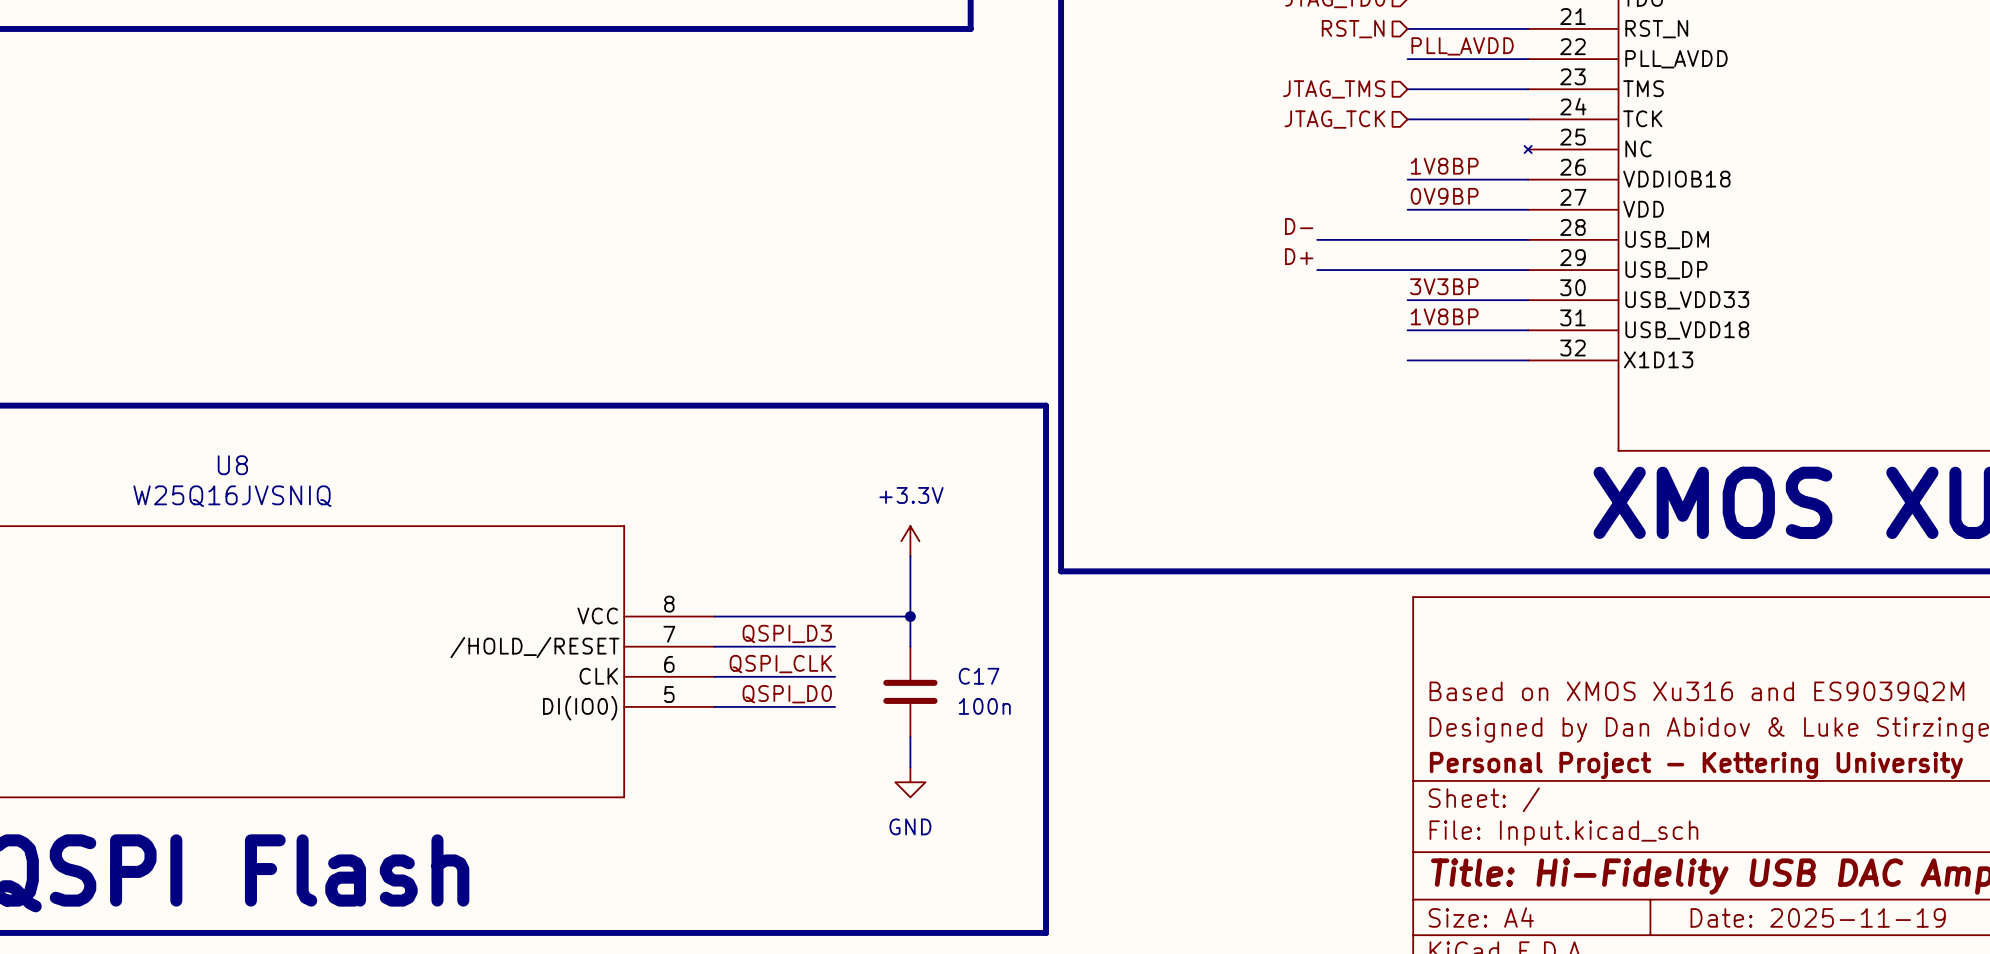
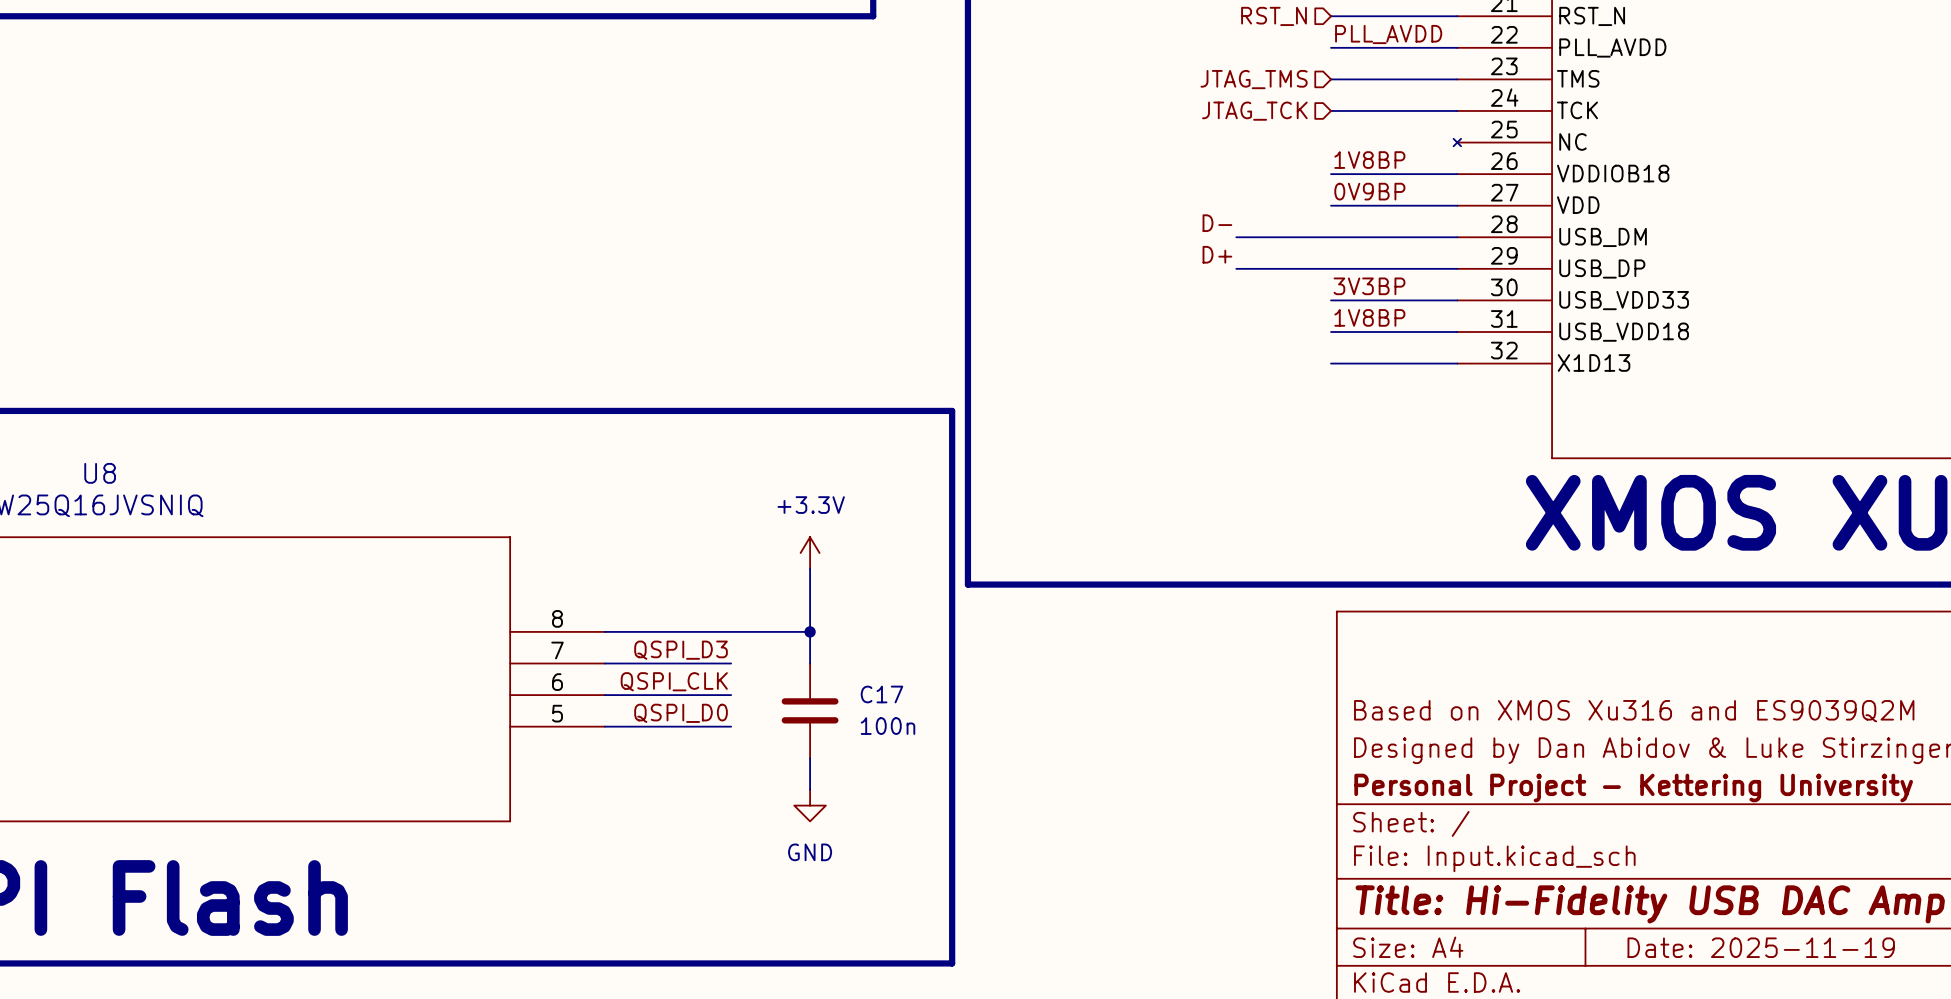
U8 pin name: VCC (597, 615) -> none
U8 pin name: /HOLD_/RESET (534, 647) -> none
U8 pin name: CLK (598, 676) -> none
U8 pin name: DI(IO0) (580, 708) -> none

